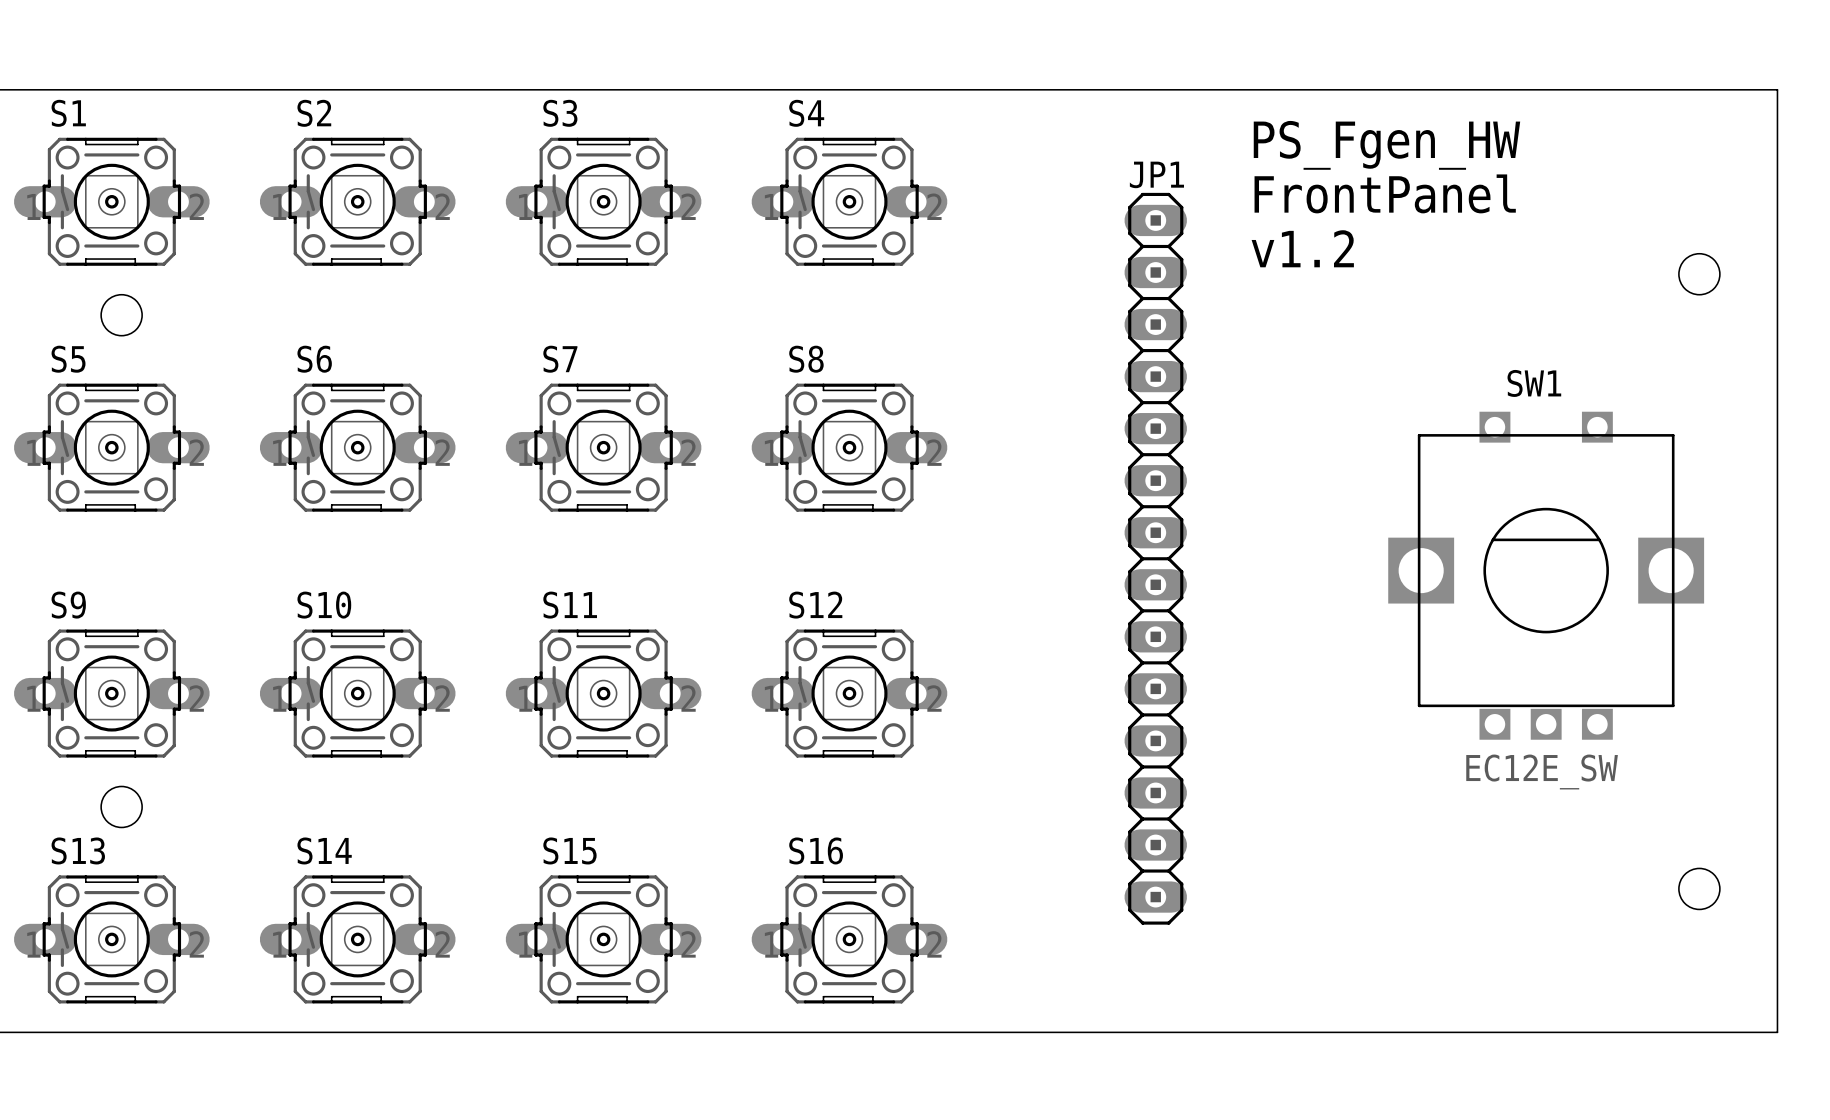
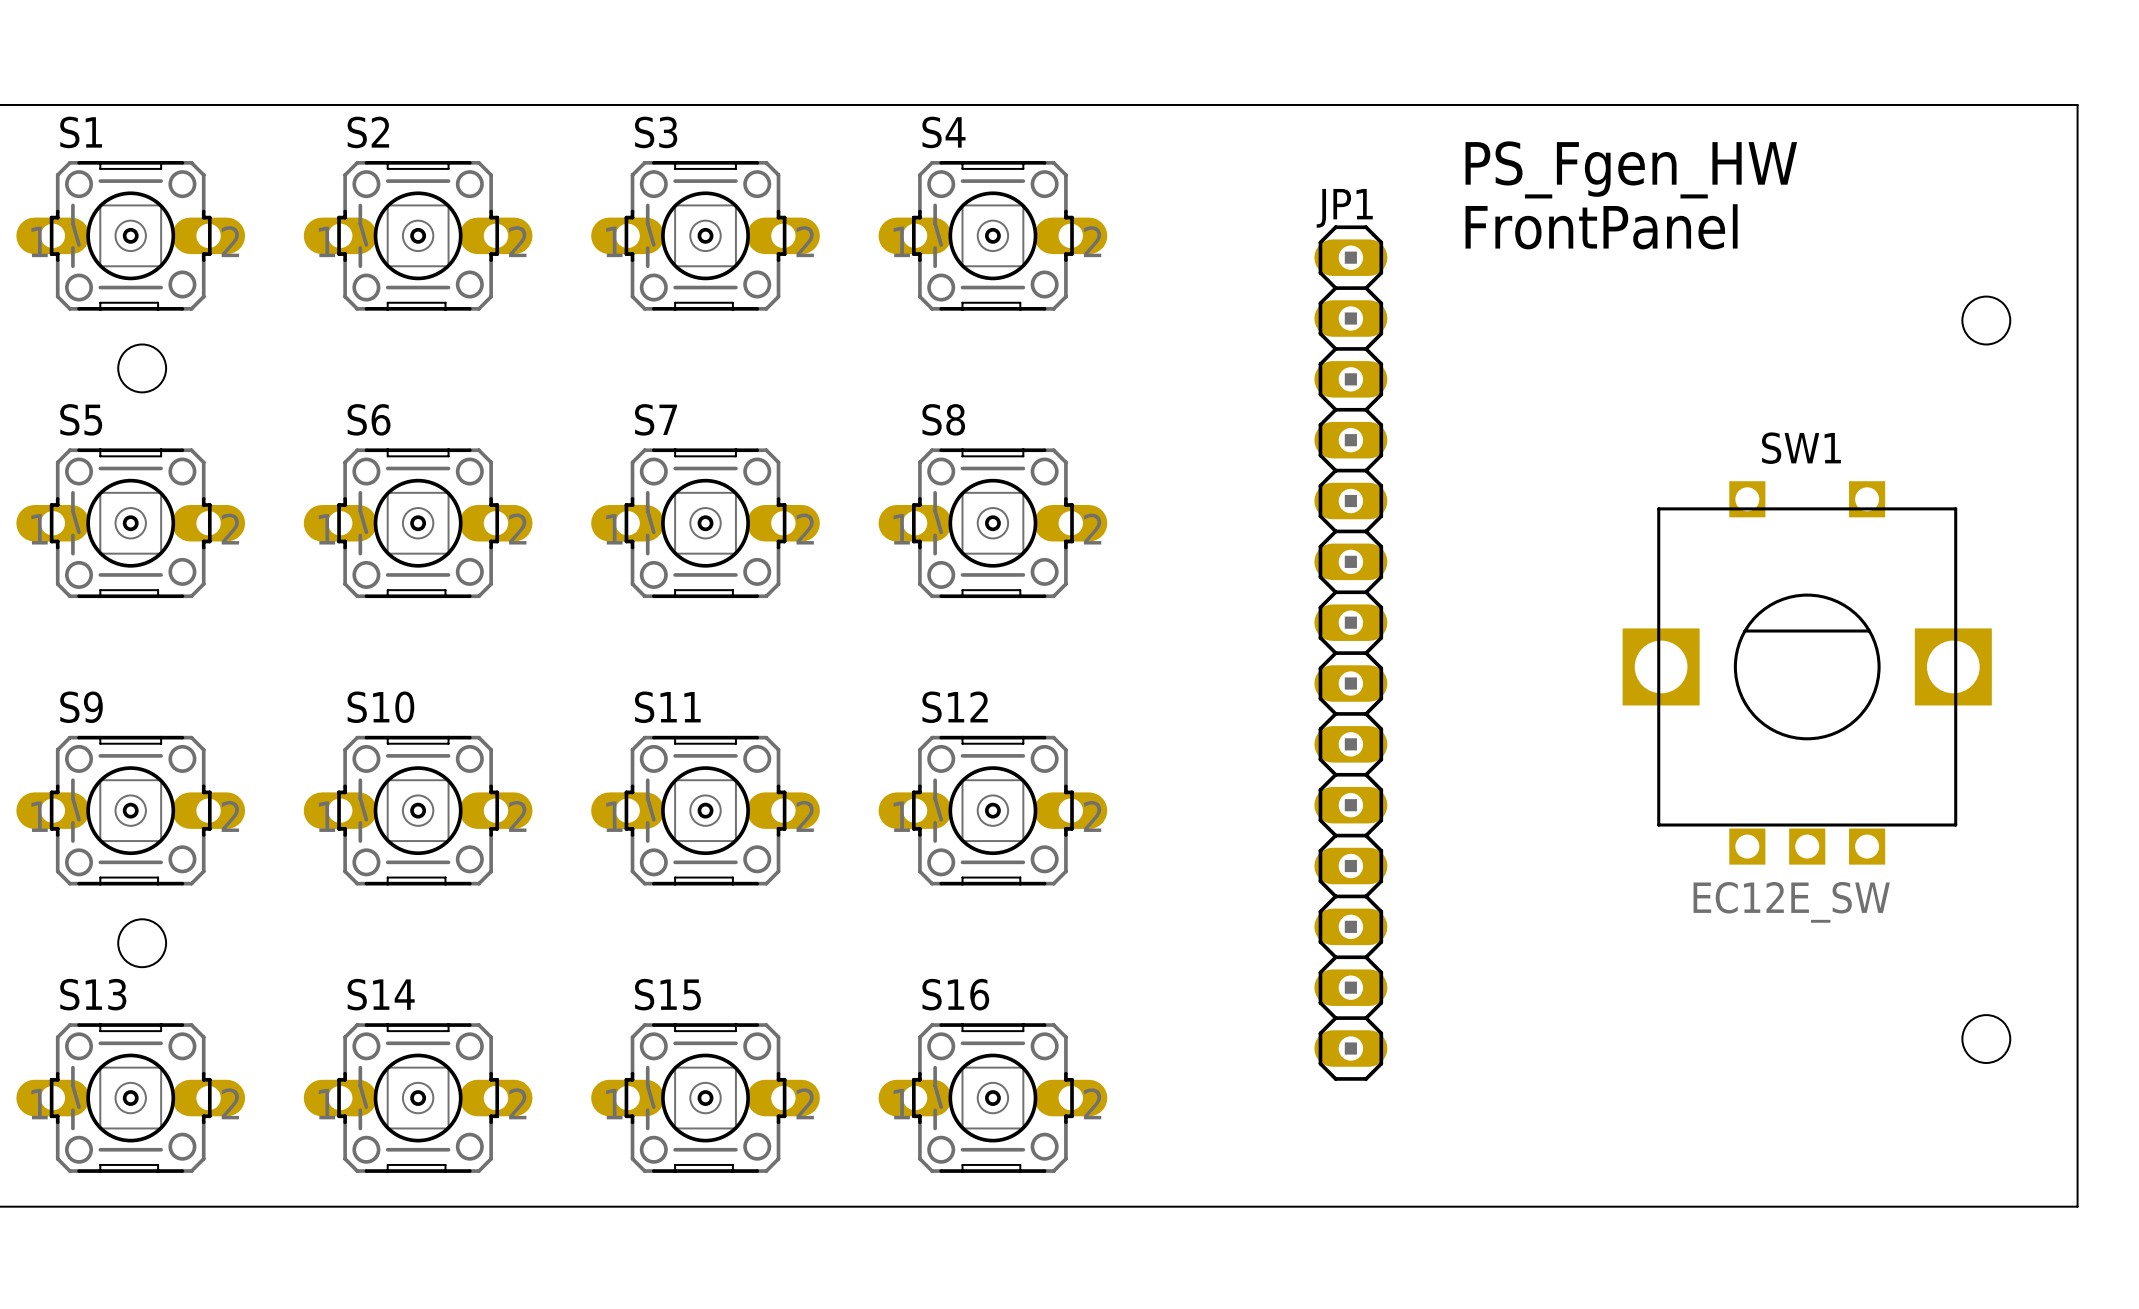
text: v1.2 (1302, 248) -> none

